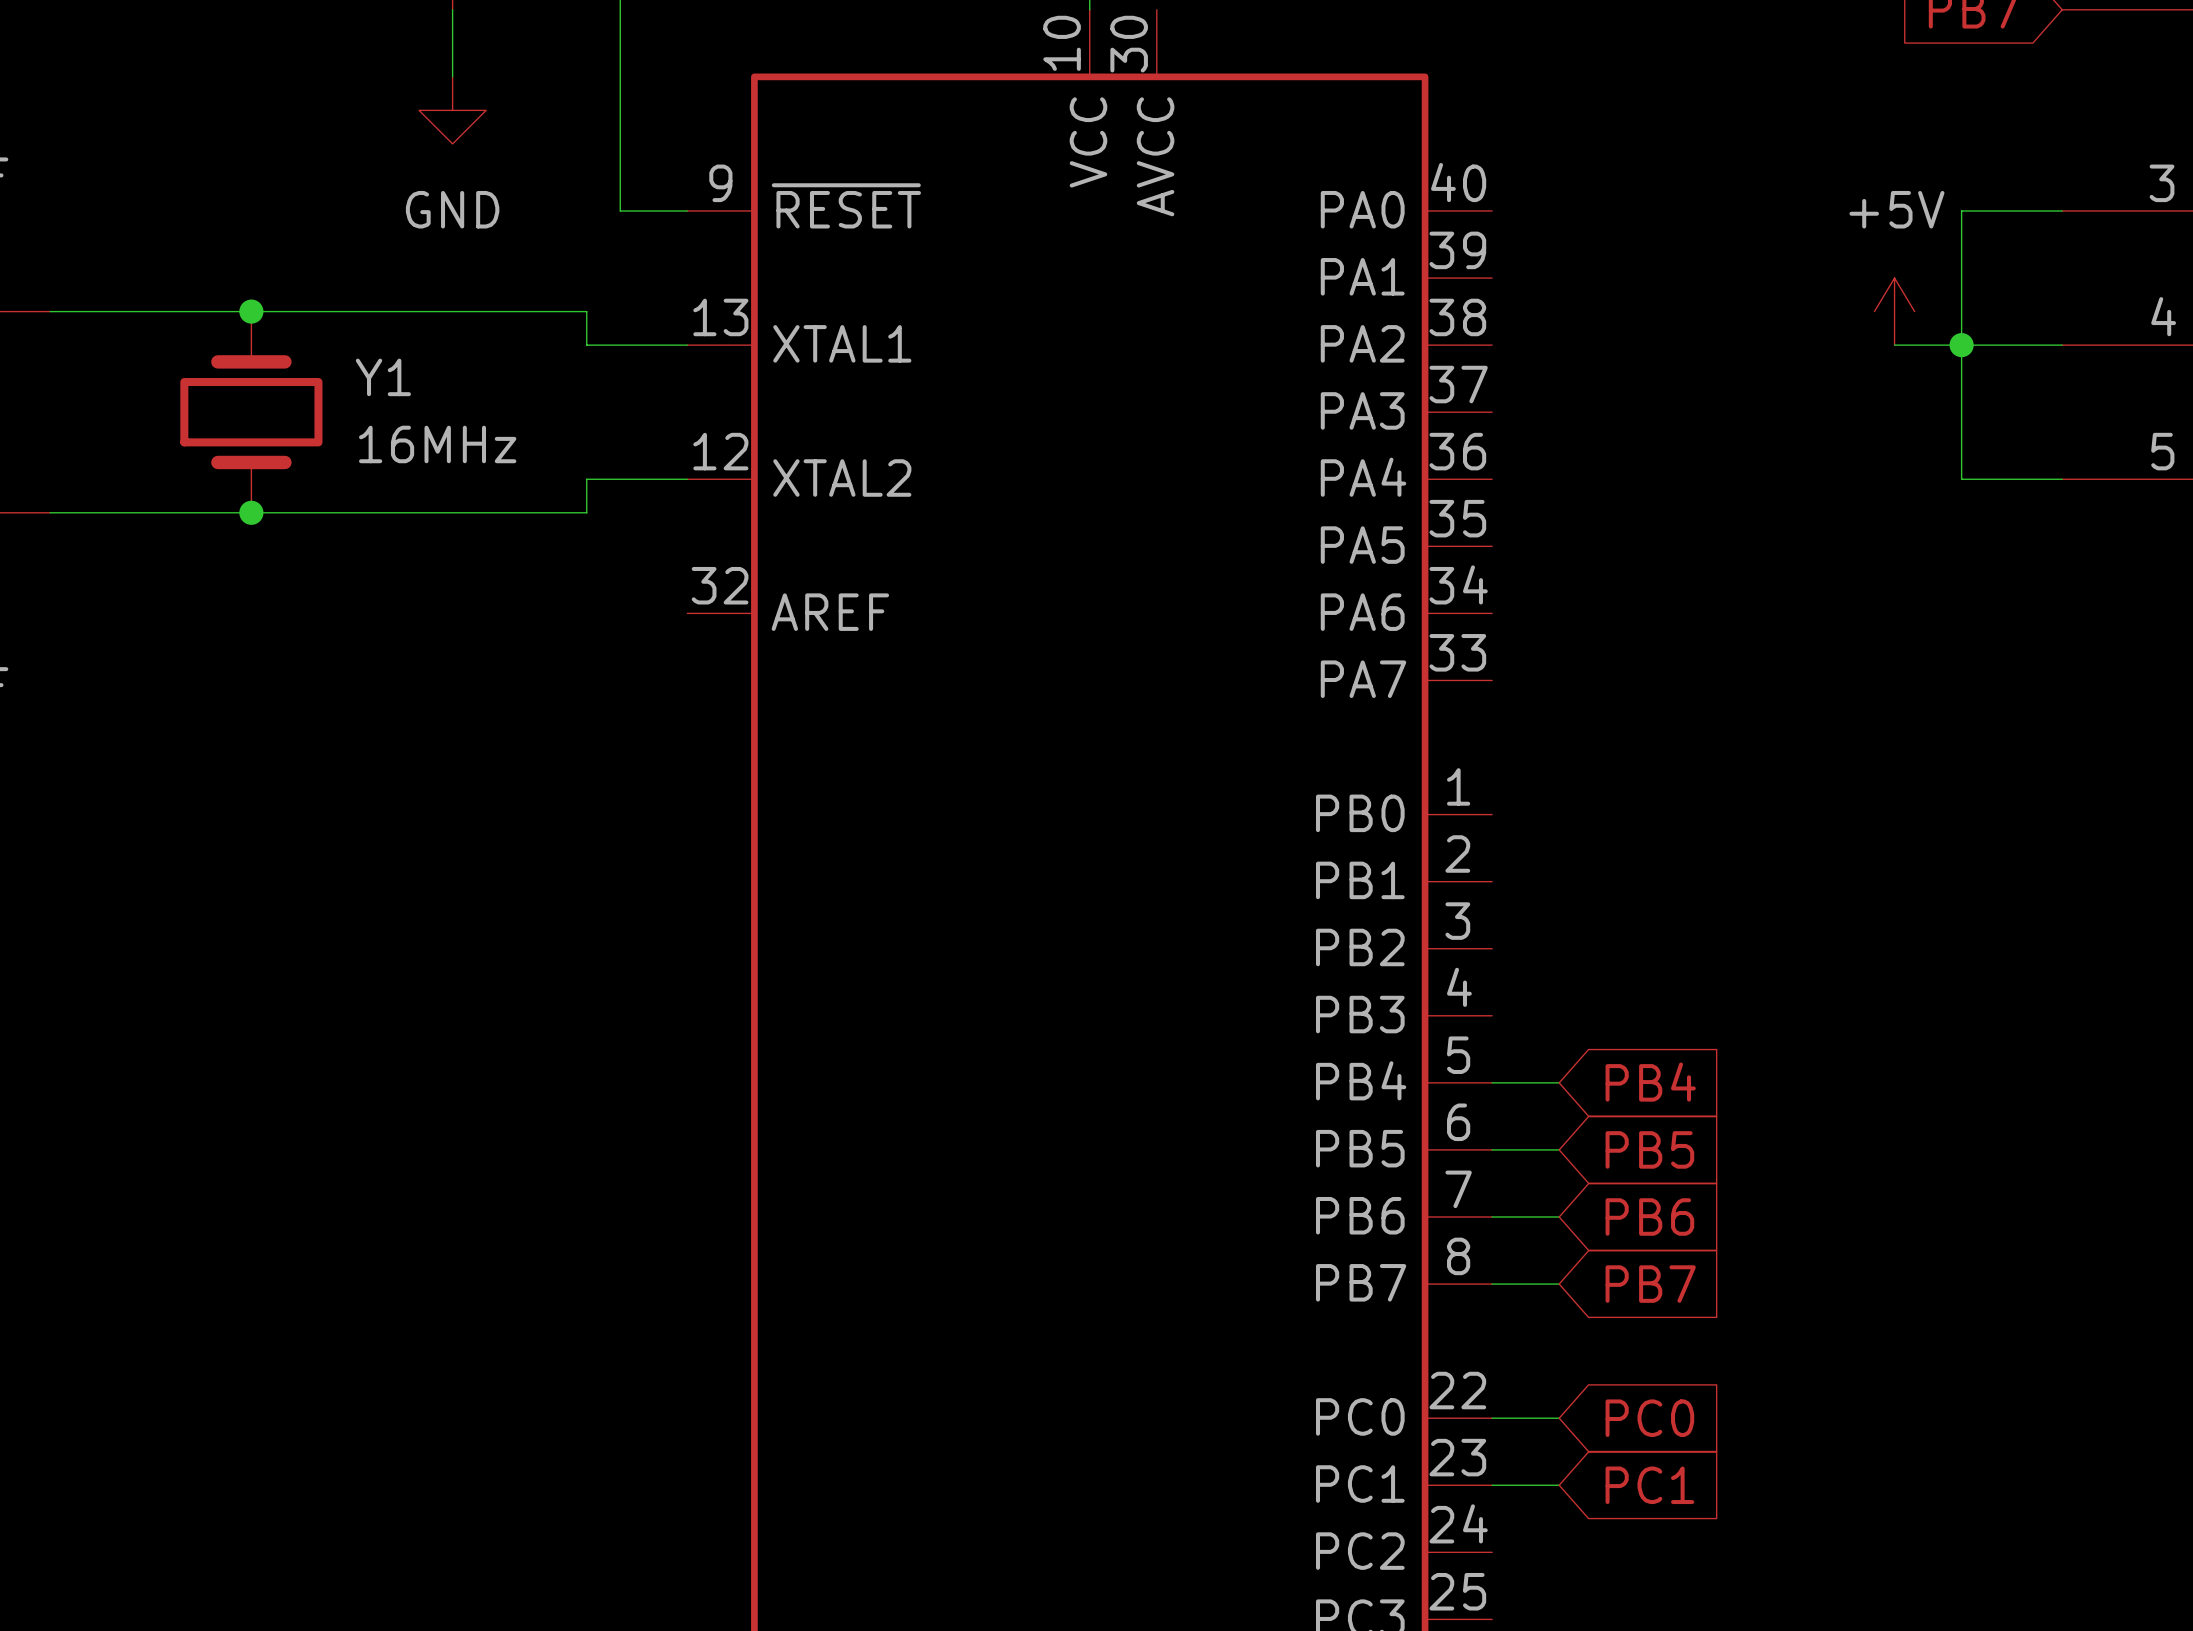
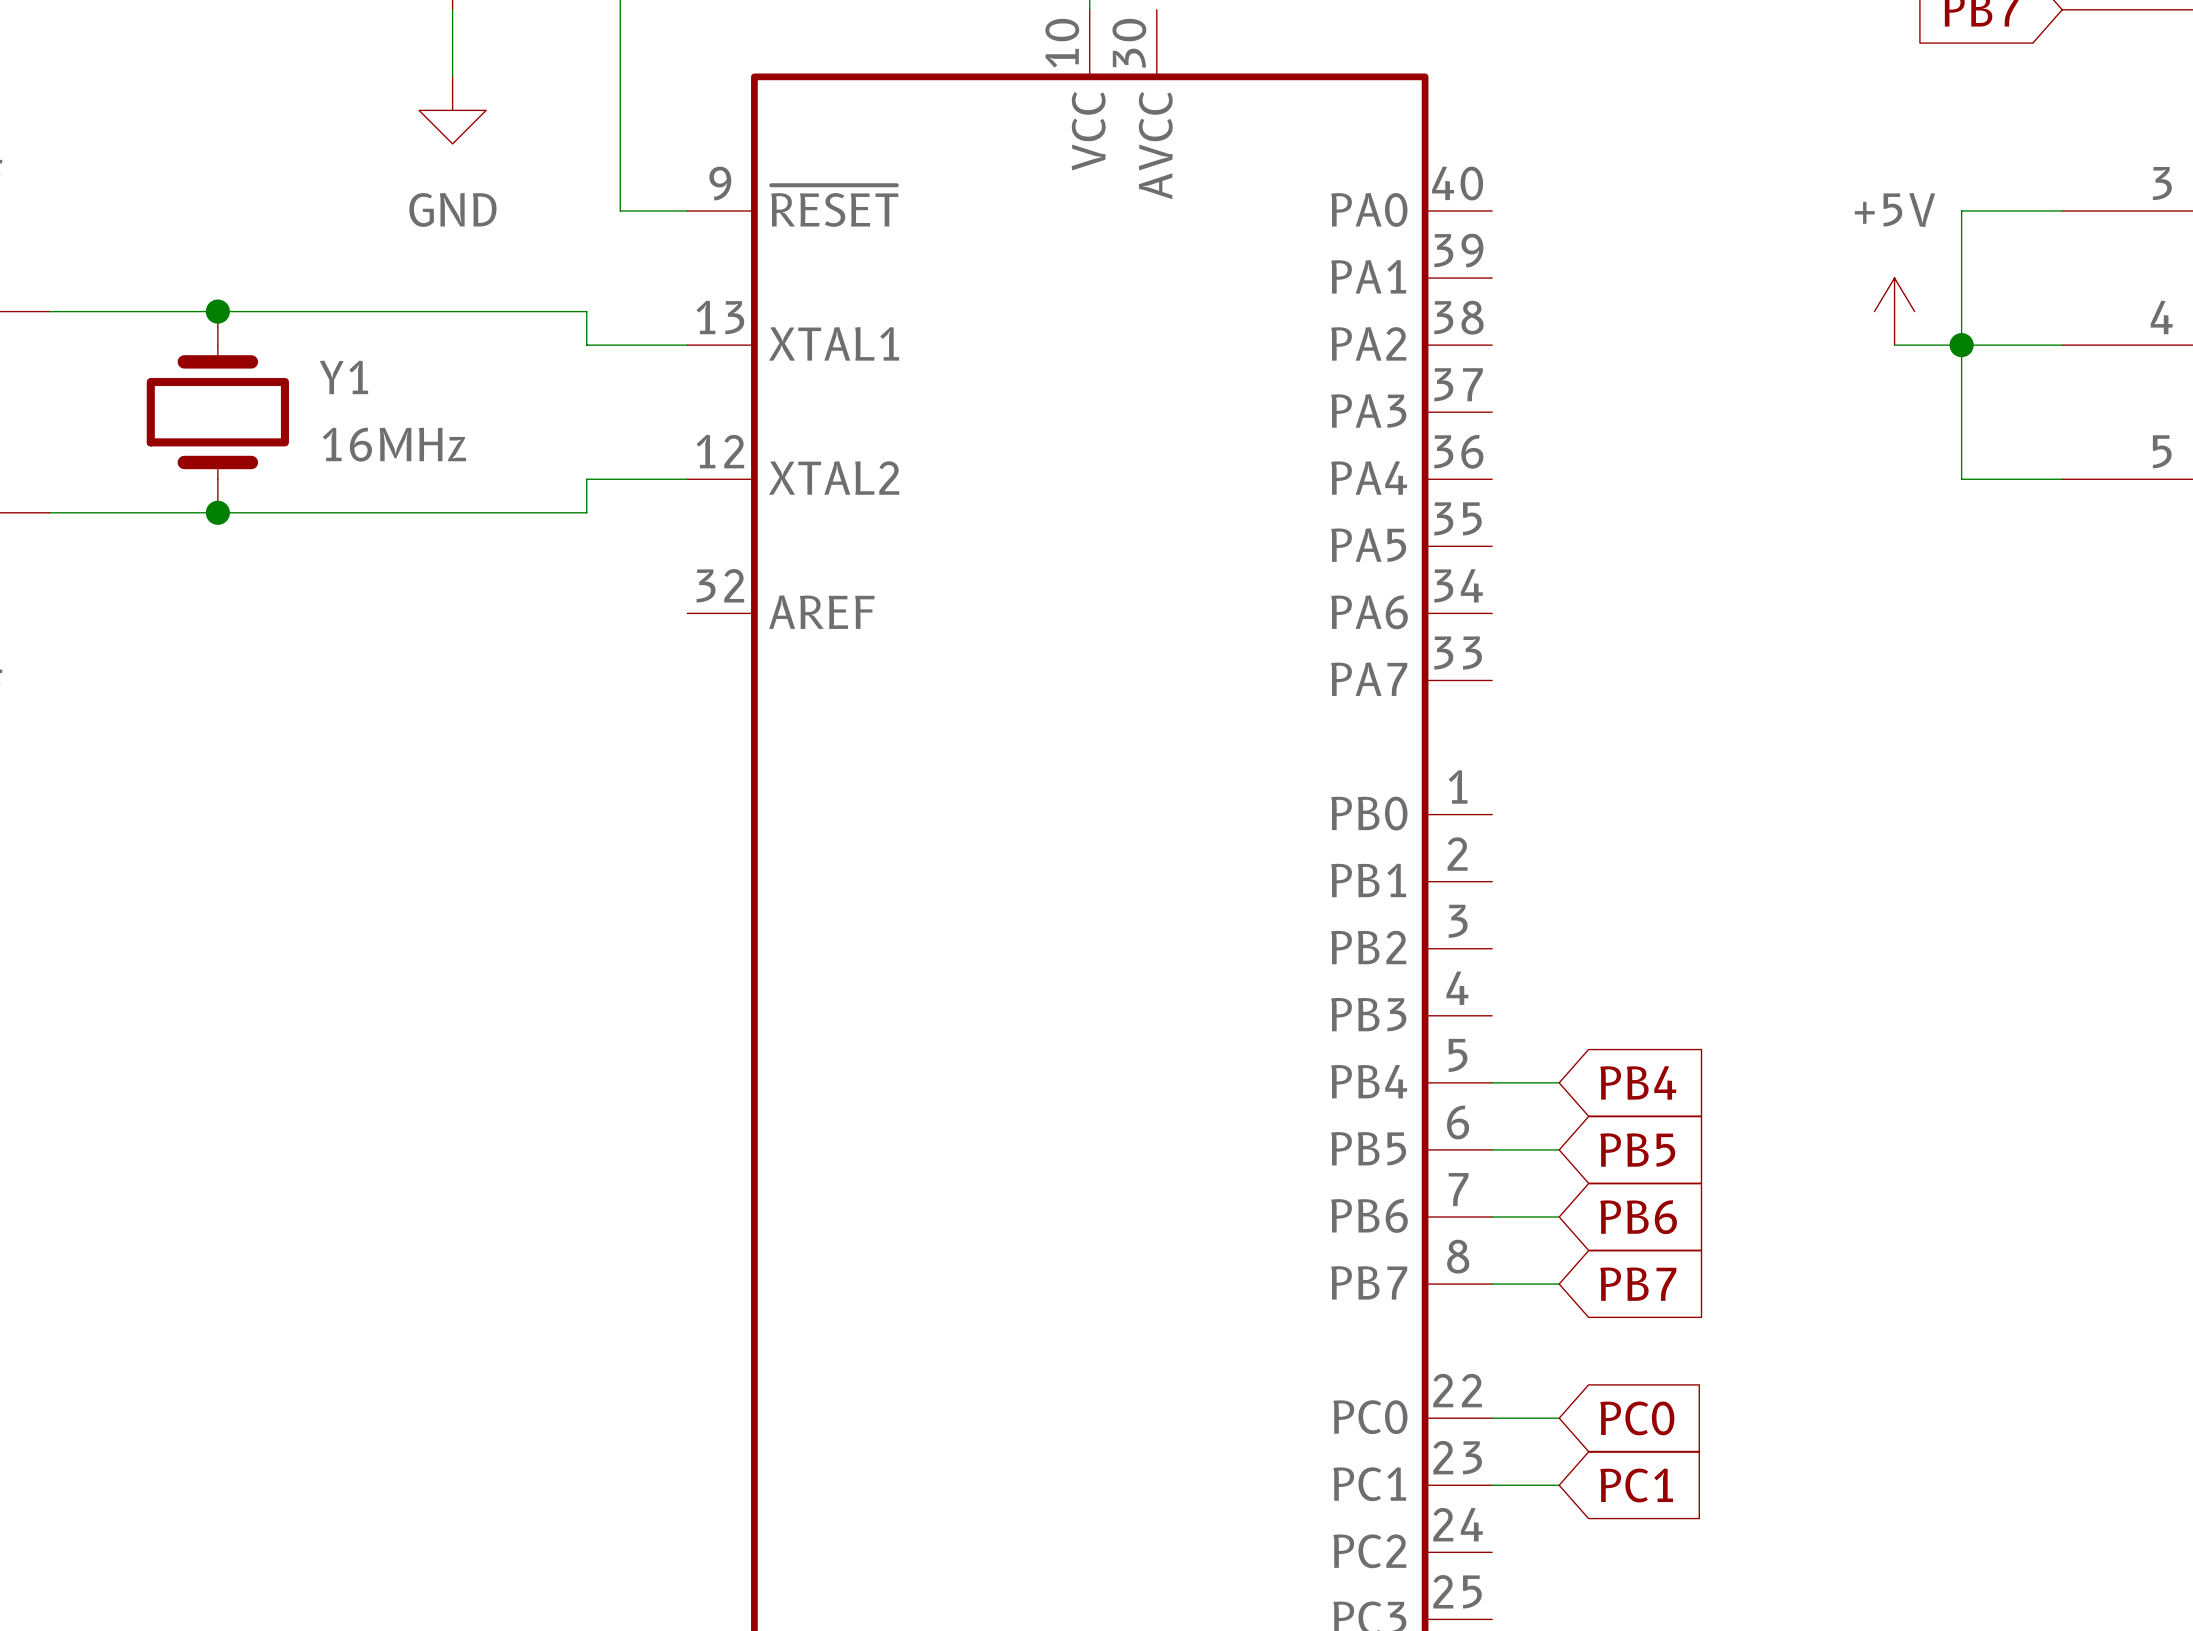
junction position: (251, 311) -> (217, 311)
Y1 position: (251, 412) -> (217, 412)
junction position: (251, 512) -> (217, 512)

